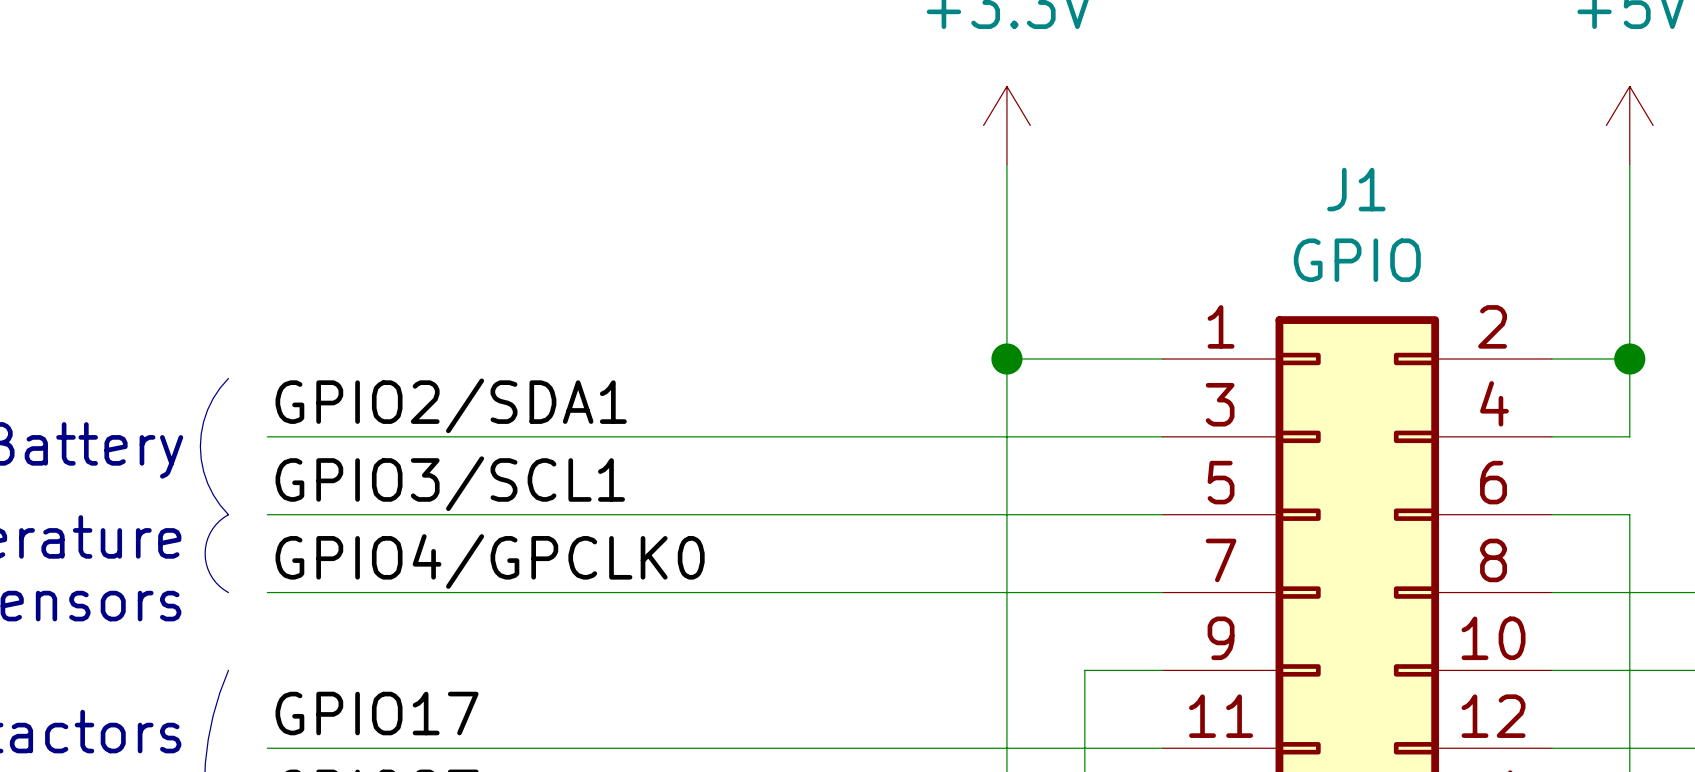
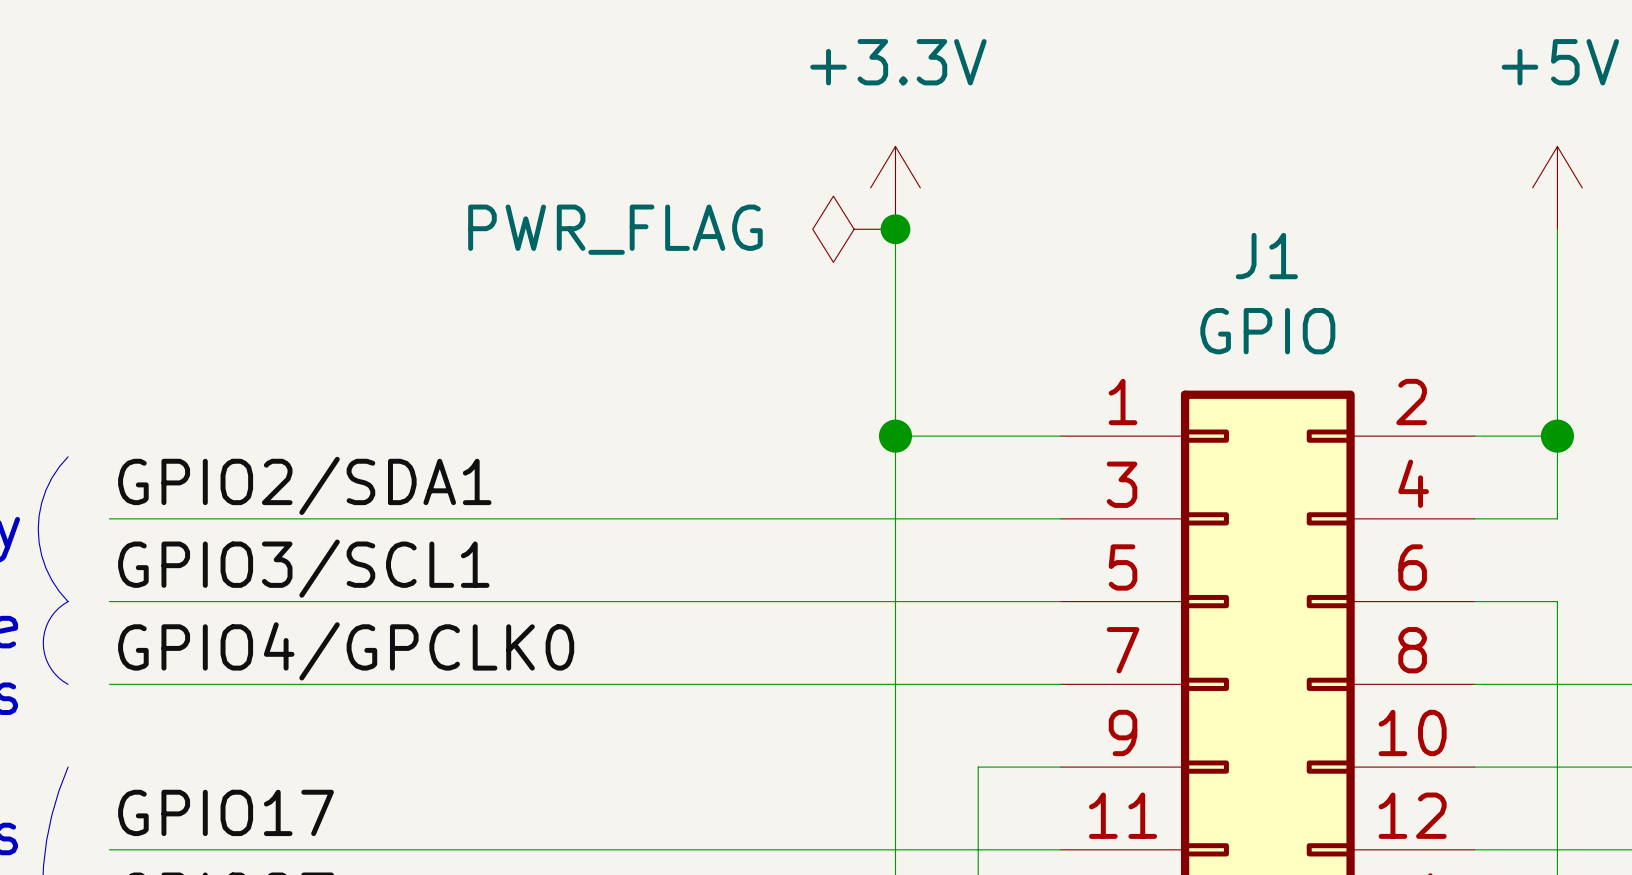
power symbol: none -> PWR_FLAG (854, 229)
junction: none -> (895, 229)

